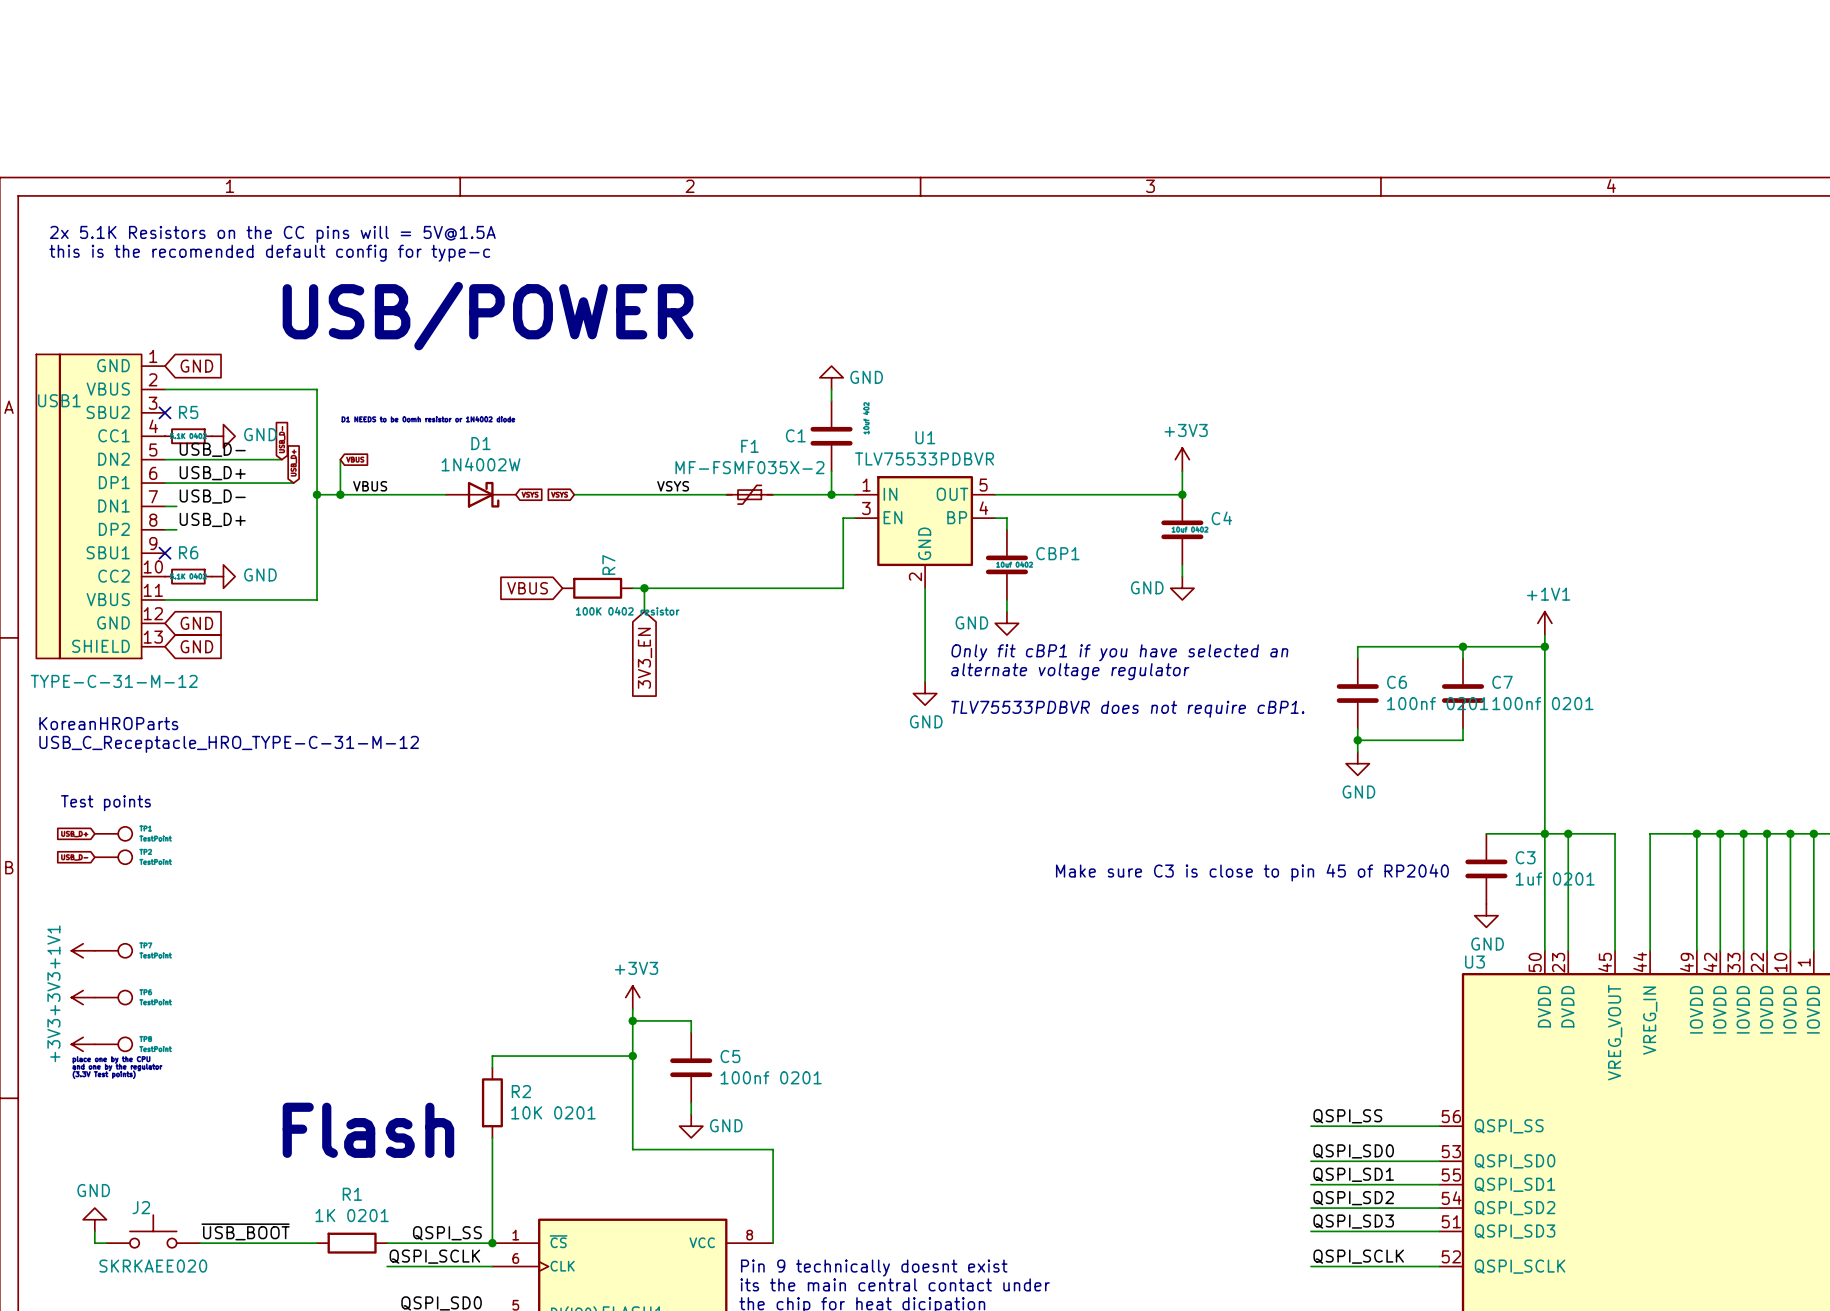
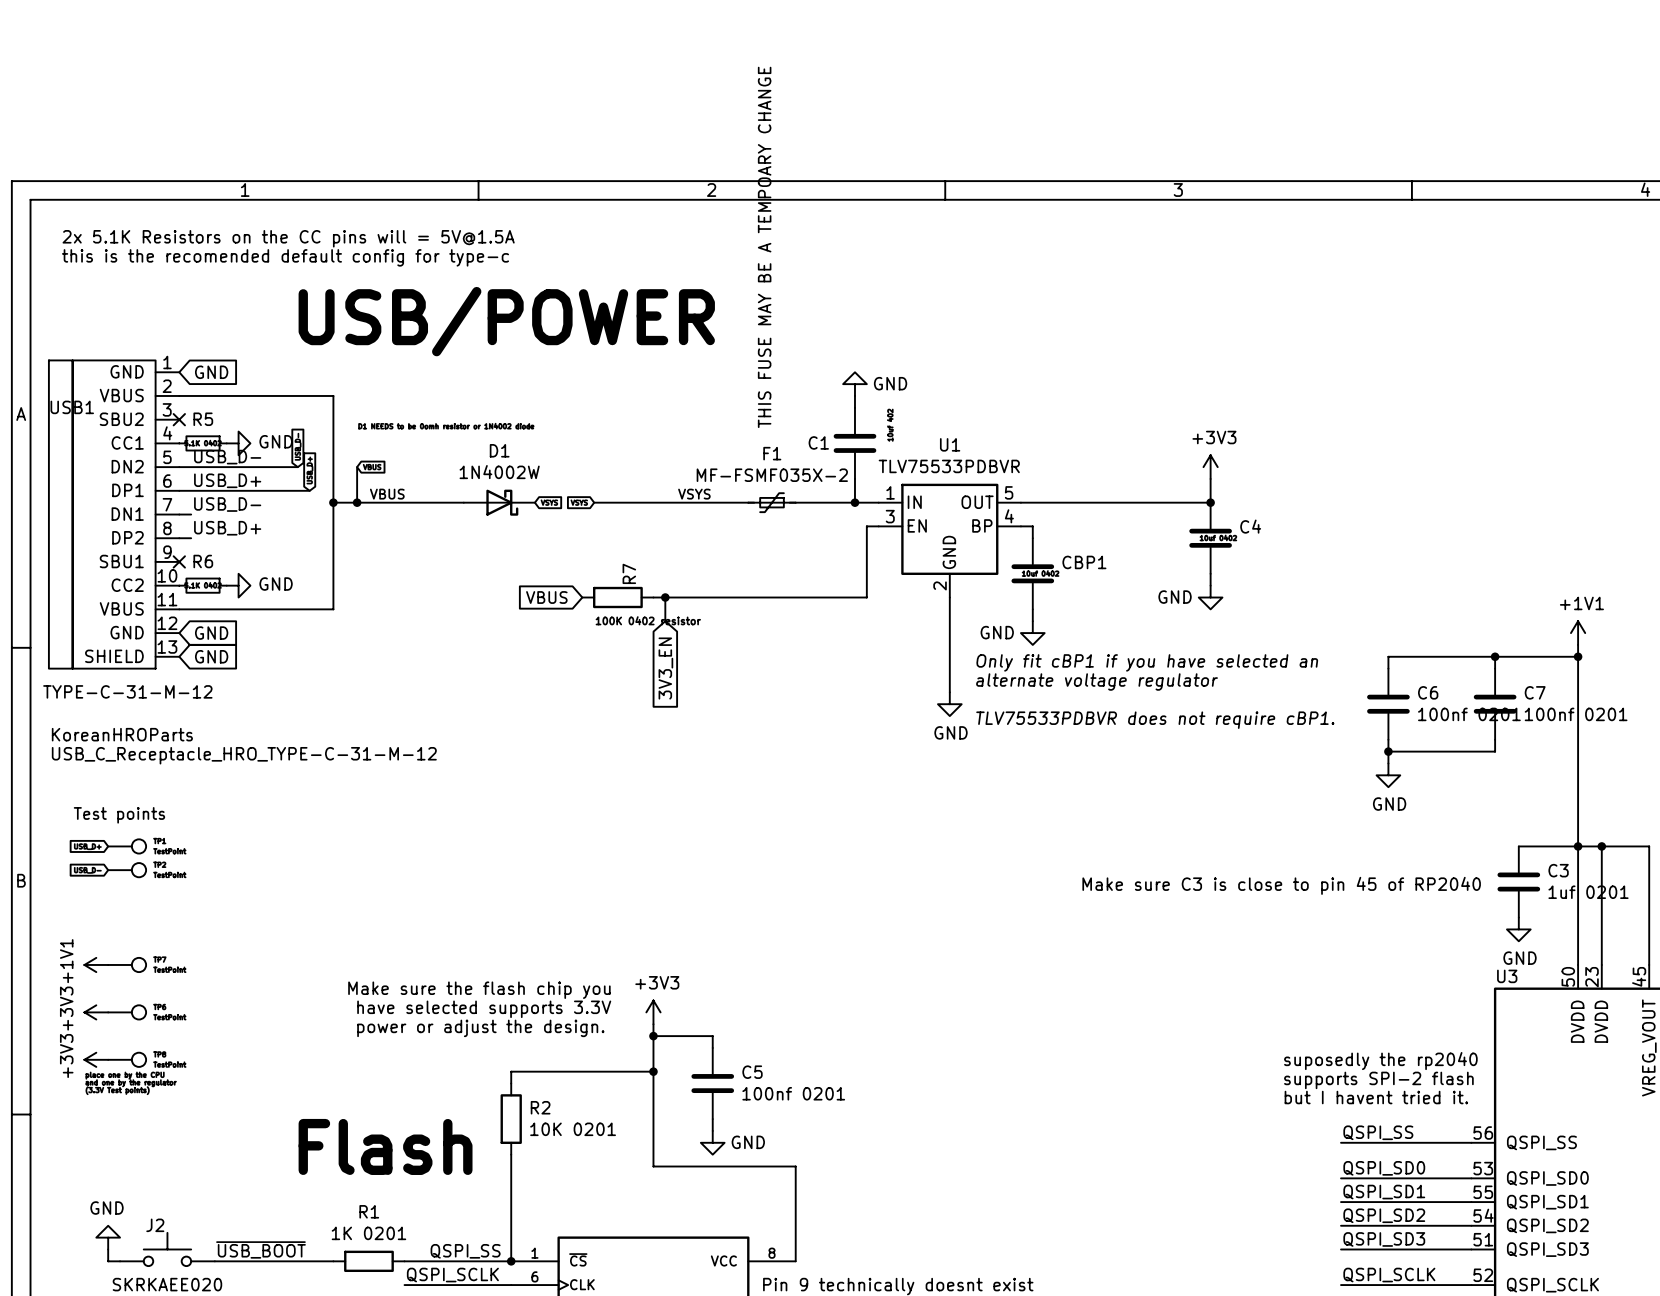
text: none -> THIS FUSE MAY BE A TEMPOARY CHANGE (764, 247)
text: none -> Make sure the flash chip you (479, 990)
text: none -> have selected supports 3.3V (484, 1009)
text: none -> power or adjust the design. (480, 1028)
text: none -> suposedly the rp2040 (1380, 1061)
text: none -> supports SPI-2 flash (1378, 1080)
text: none -> but I havent tried it. (1376, 1097)

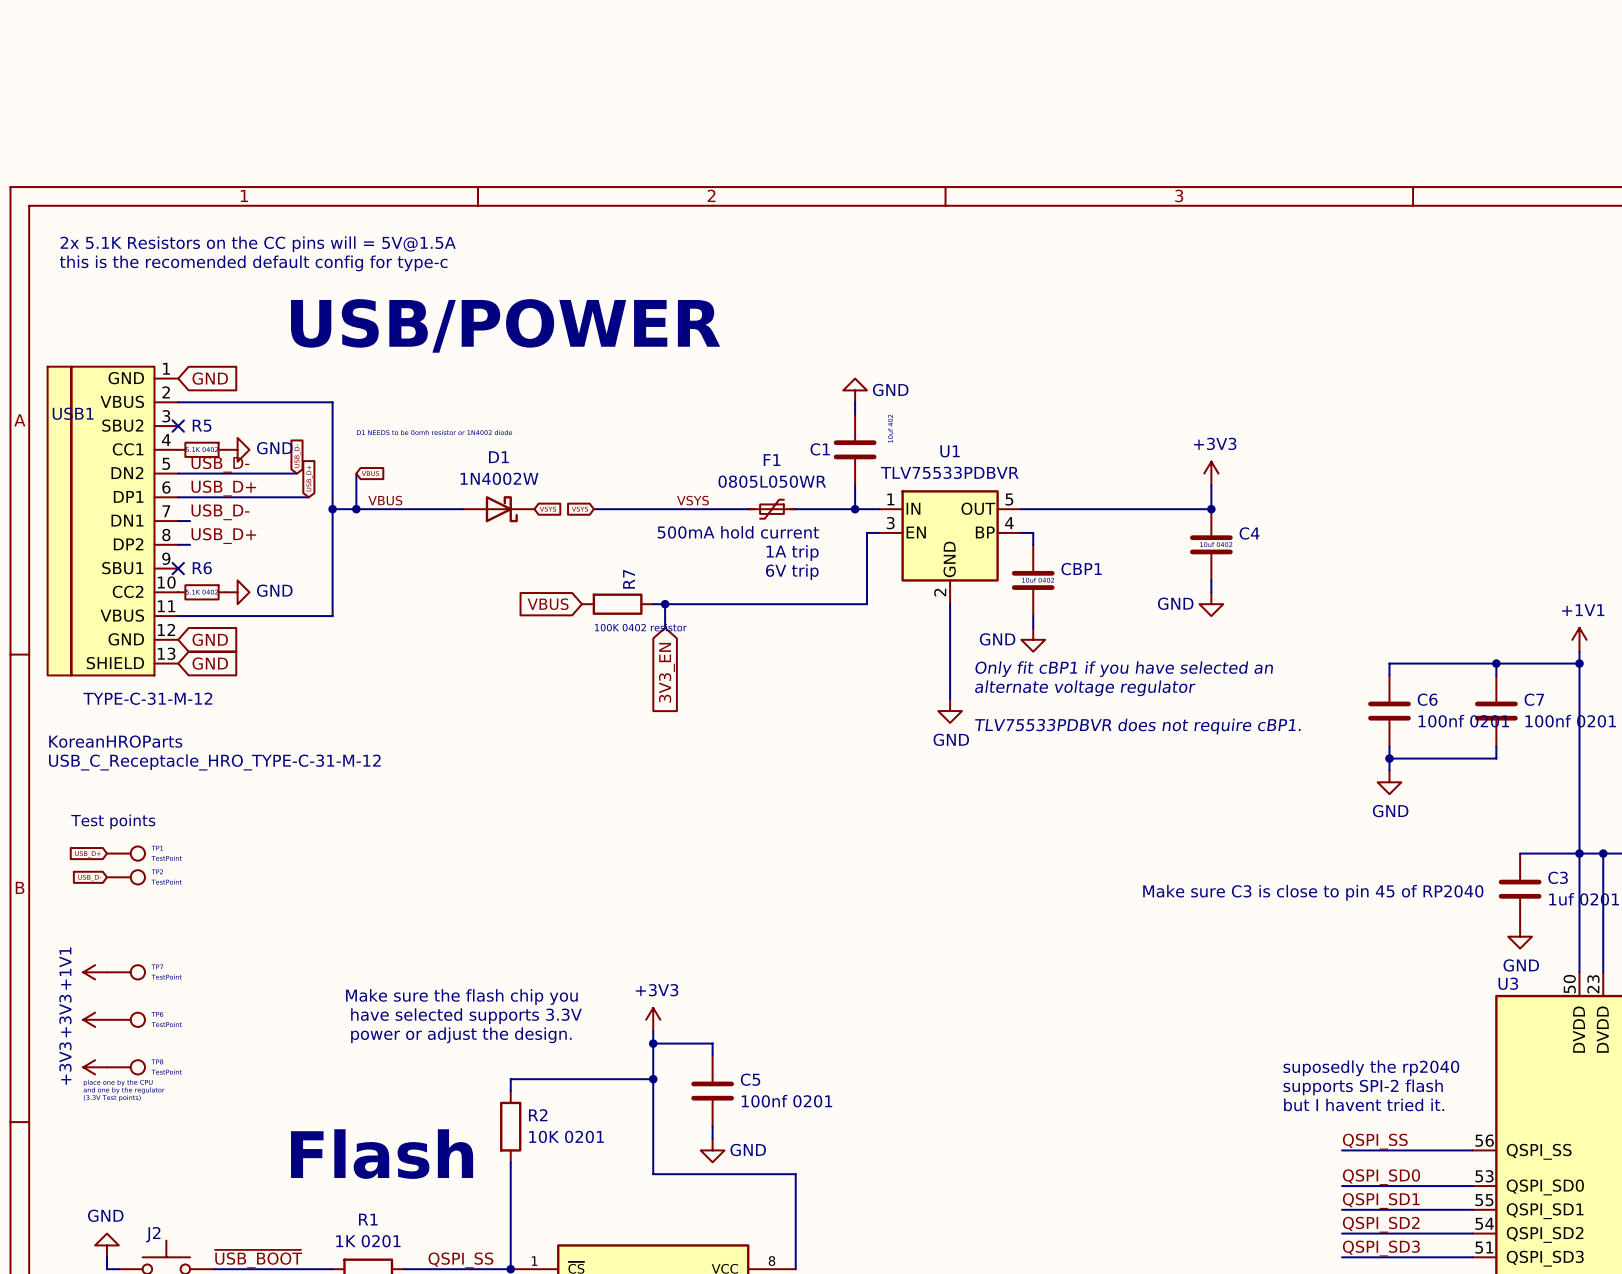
text: THIS FUSE MAY BE A TEMPOARY CHANGE (764, 247) -> none
F1 value: MF-FSMF035X-2 (772, 475) -> 0805L050WR (772, 481)
text: none -> 500mA hold current (738, 532)
text: none -> 1A trip (792, 553)
text: none -> 6V trip (792, 572)

